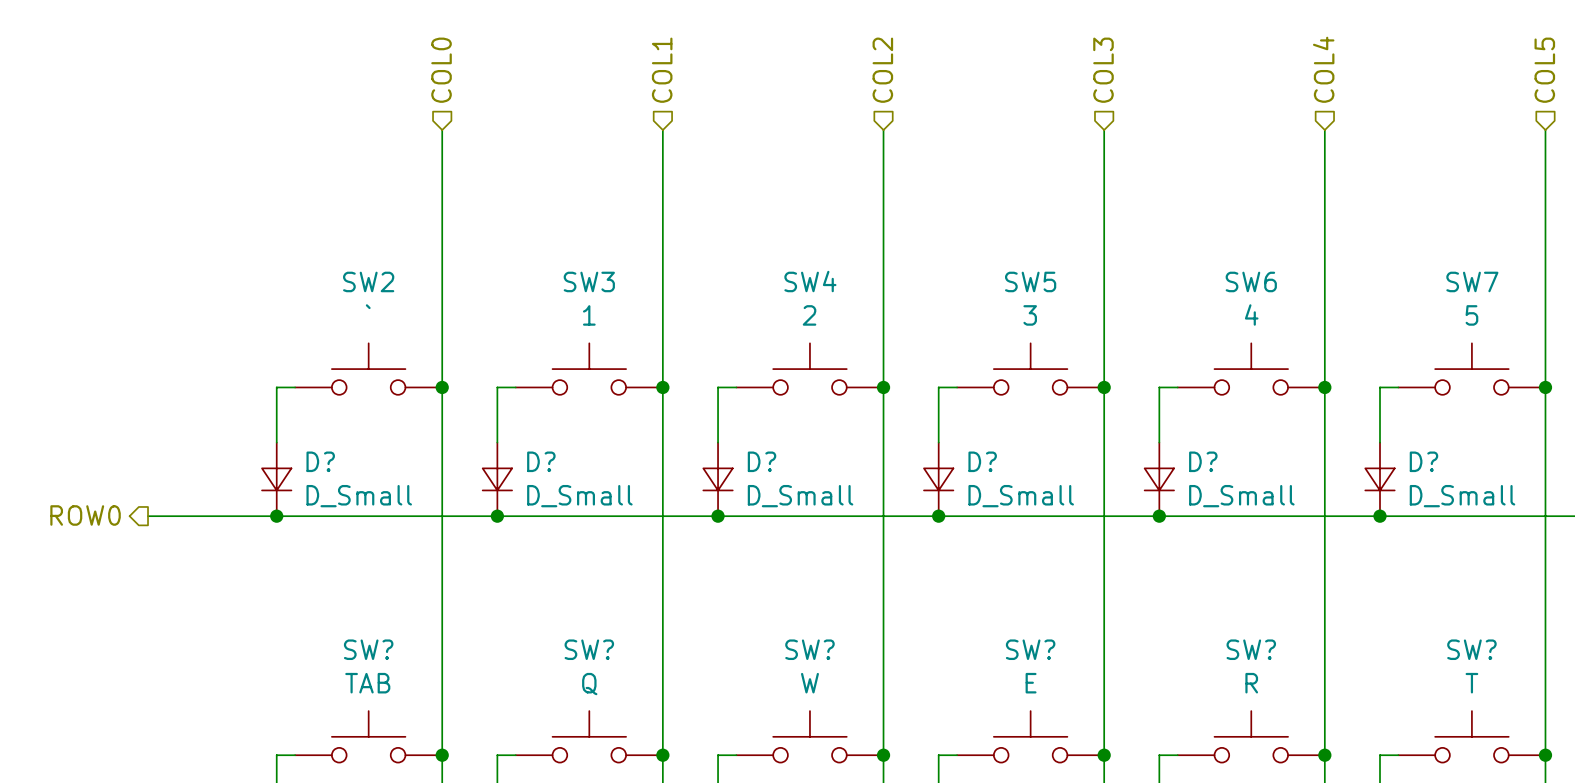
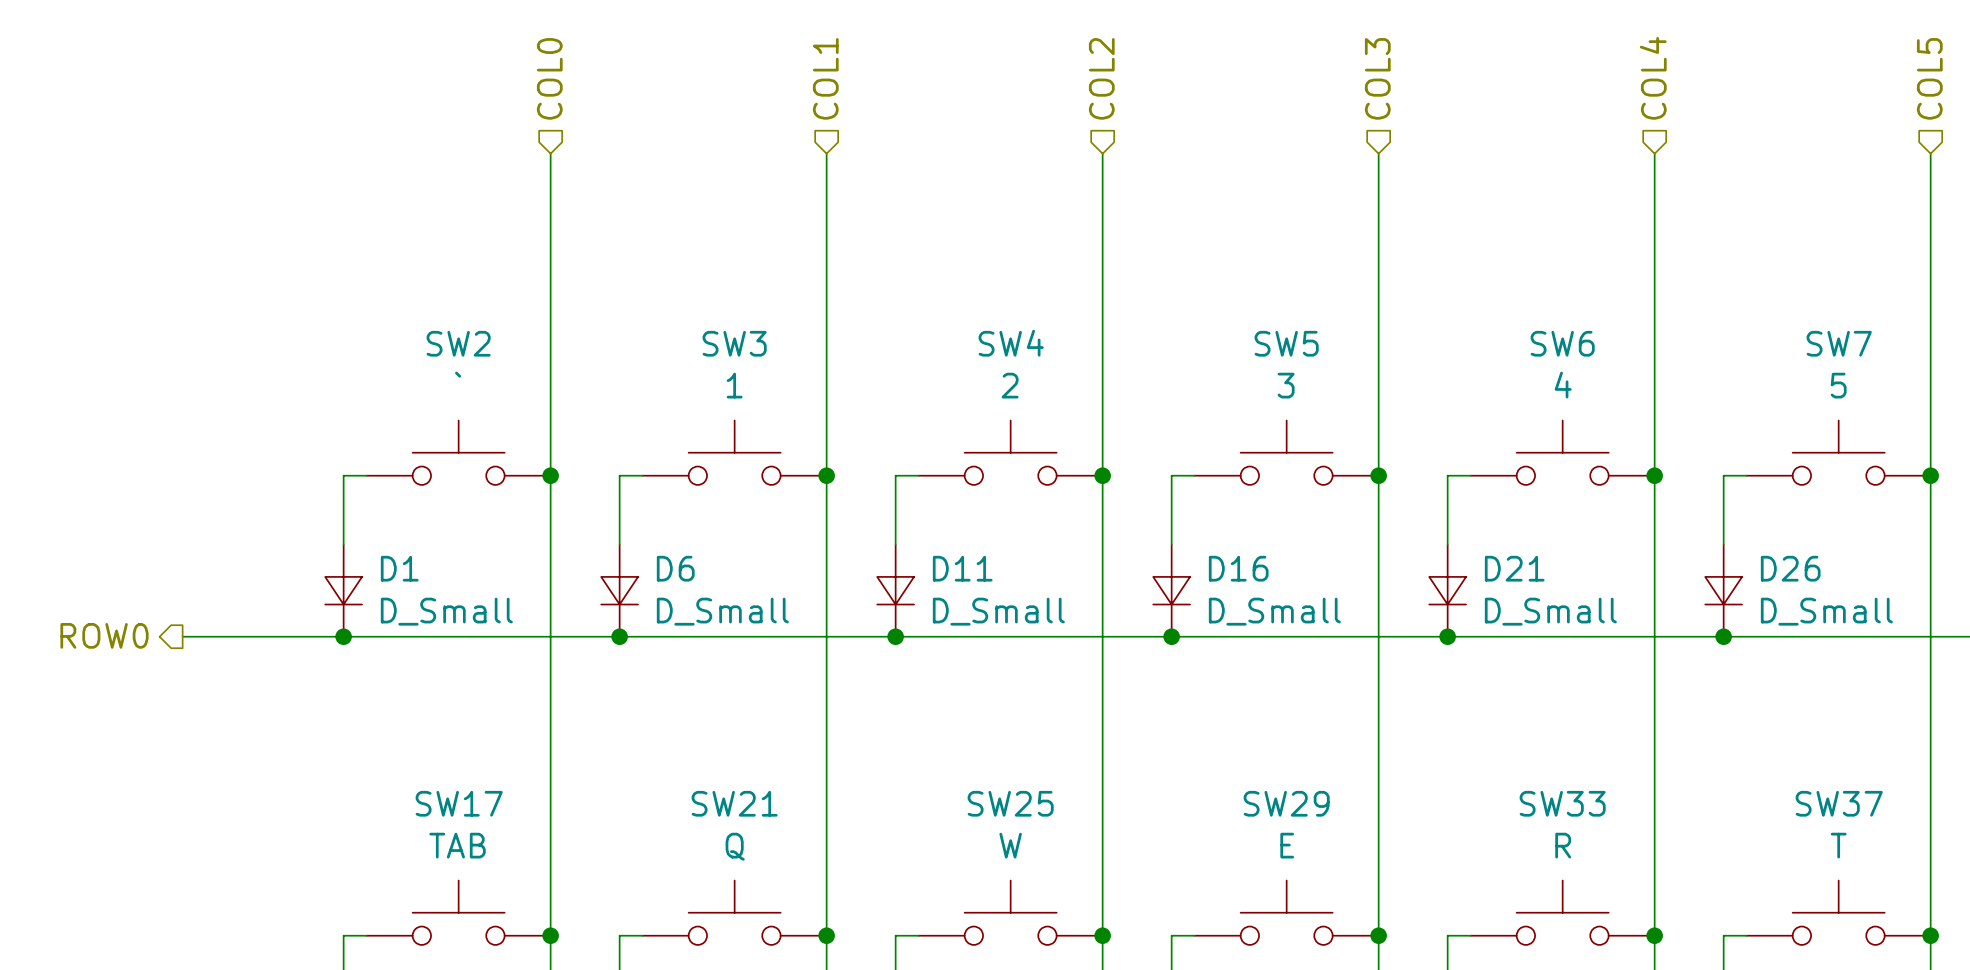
D? name: D? (320, 461) -> D1 (399, 568)
D? name: D? (541, 461) -> D6 (675, 568)
D? name: D? (762, 461) -> D11 (962, 568)
D? name: D? (982, 461) -> D16 (1238, 568)
D? name: D? (1203, 461) -> D21 (1514, 568)
D? name: D? (1423, 461) -> D26 (1790, 568)
SW? name: SW? (368, 649) -> SW17 (459, 803)
SW? name: SW? (589, 649) -> SW21 (734, 803)
SW? name: SW? (809, 649) -> SW25 (1010, 803)
SW? name: SW? (1030, 649) -> SW29 (1286, 803)
SW? name: SW? (1251, 649) -> SW33 (1562, 803)
SW? name: SW? (1471, 649) -> SW37 (1839, 803)

